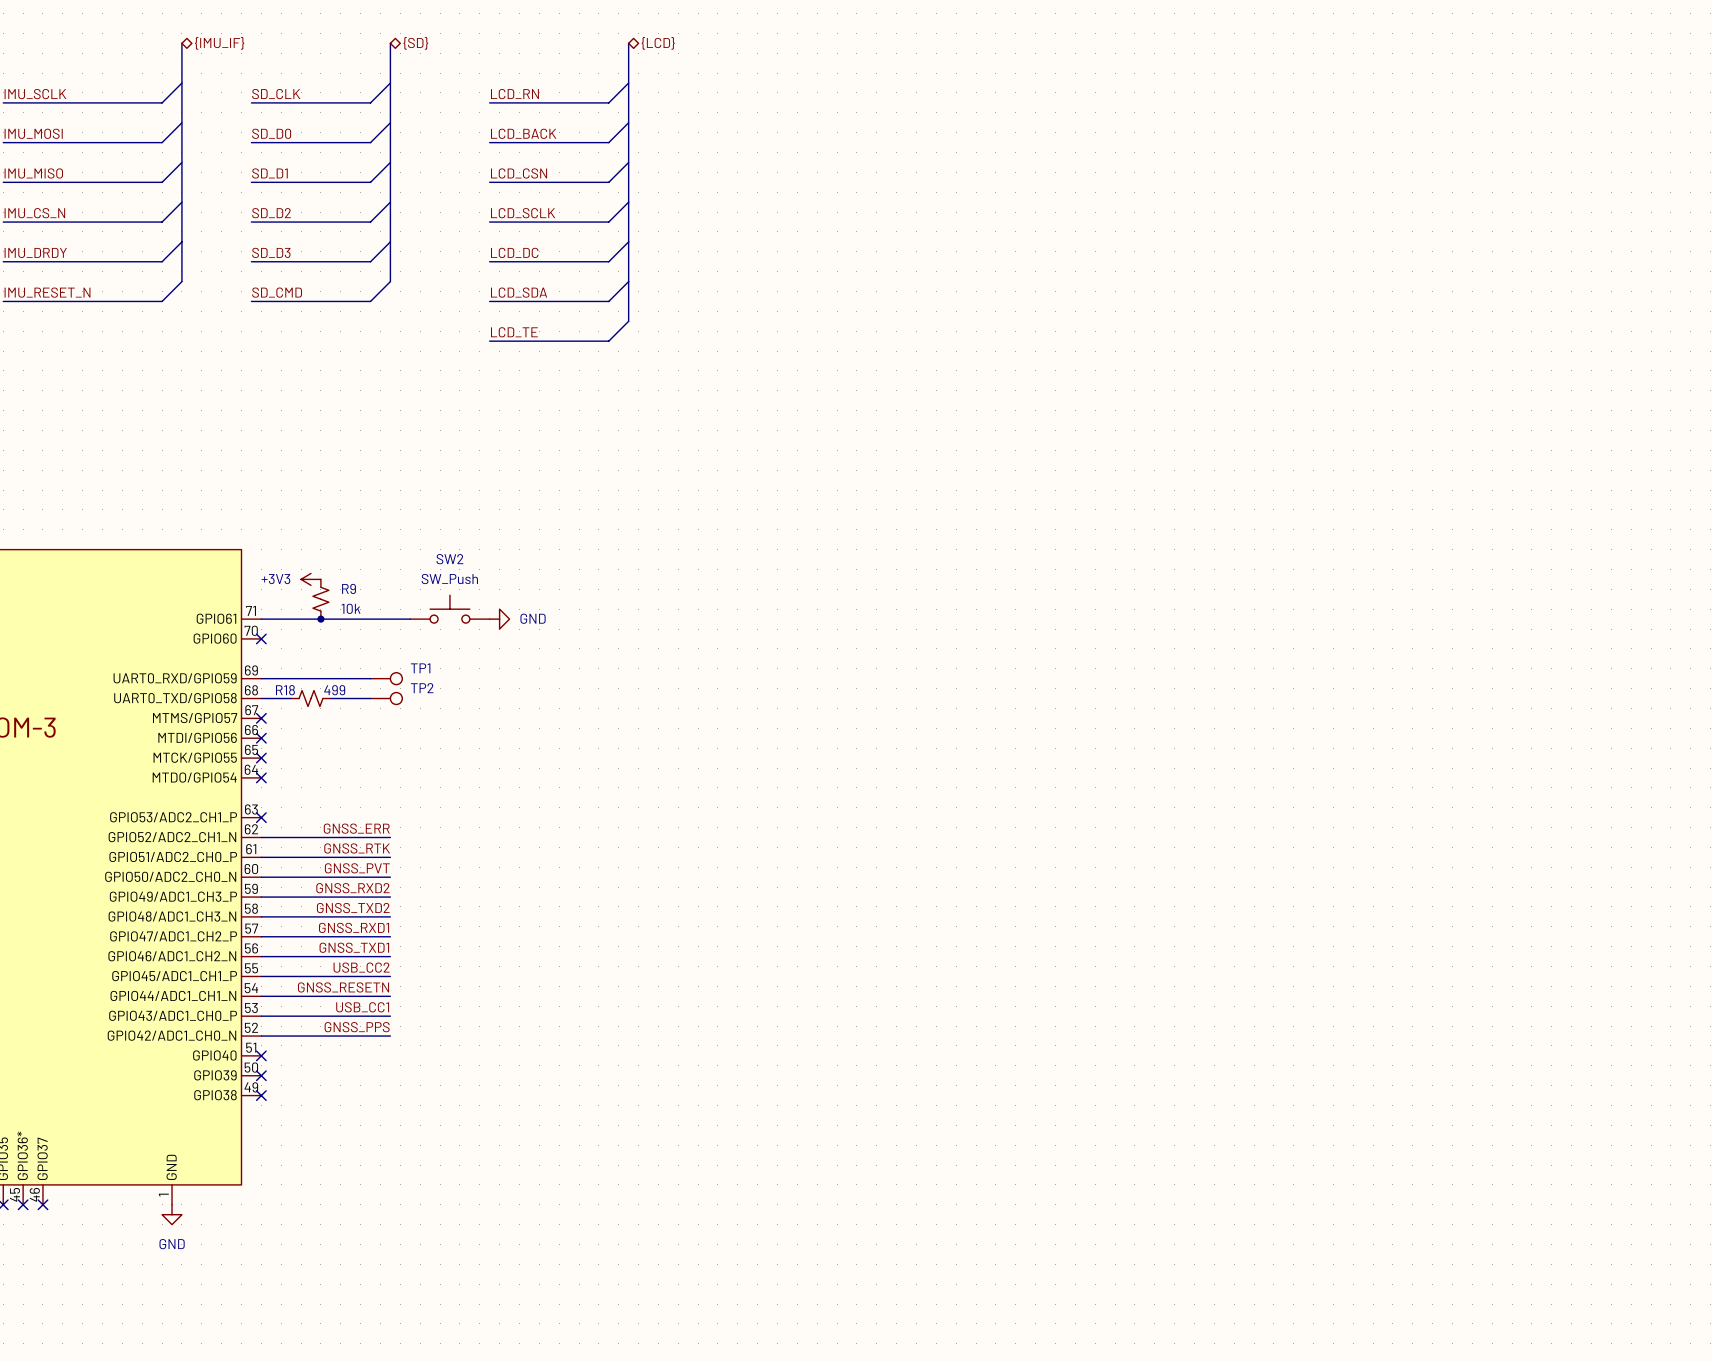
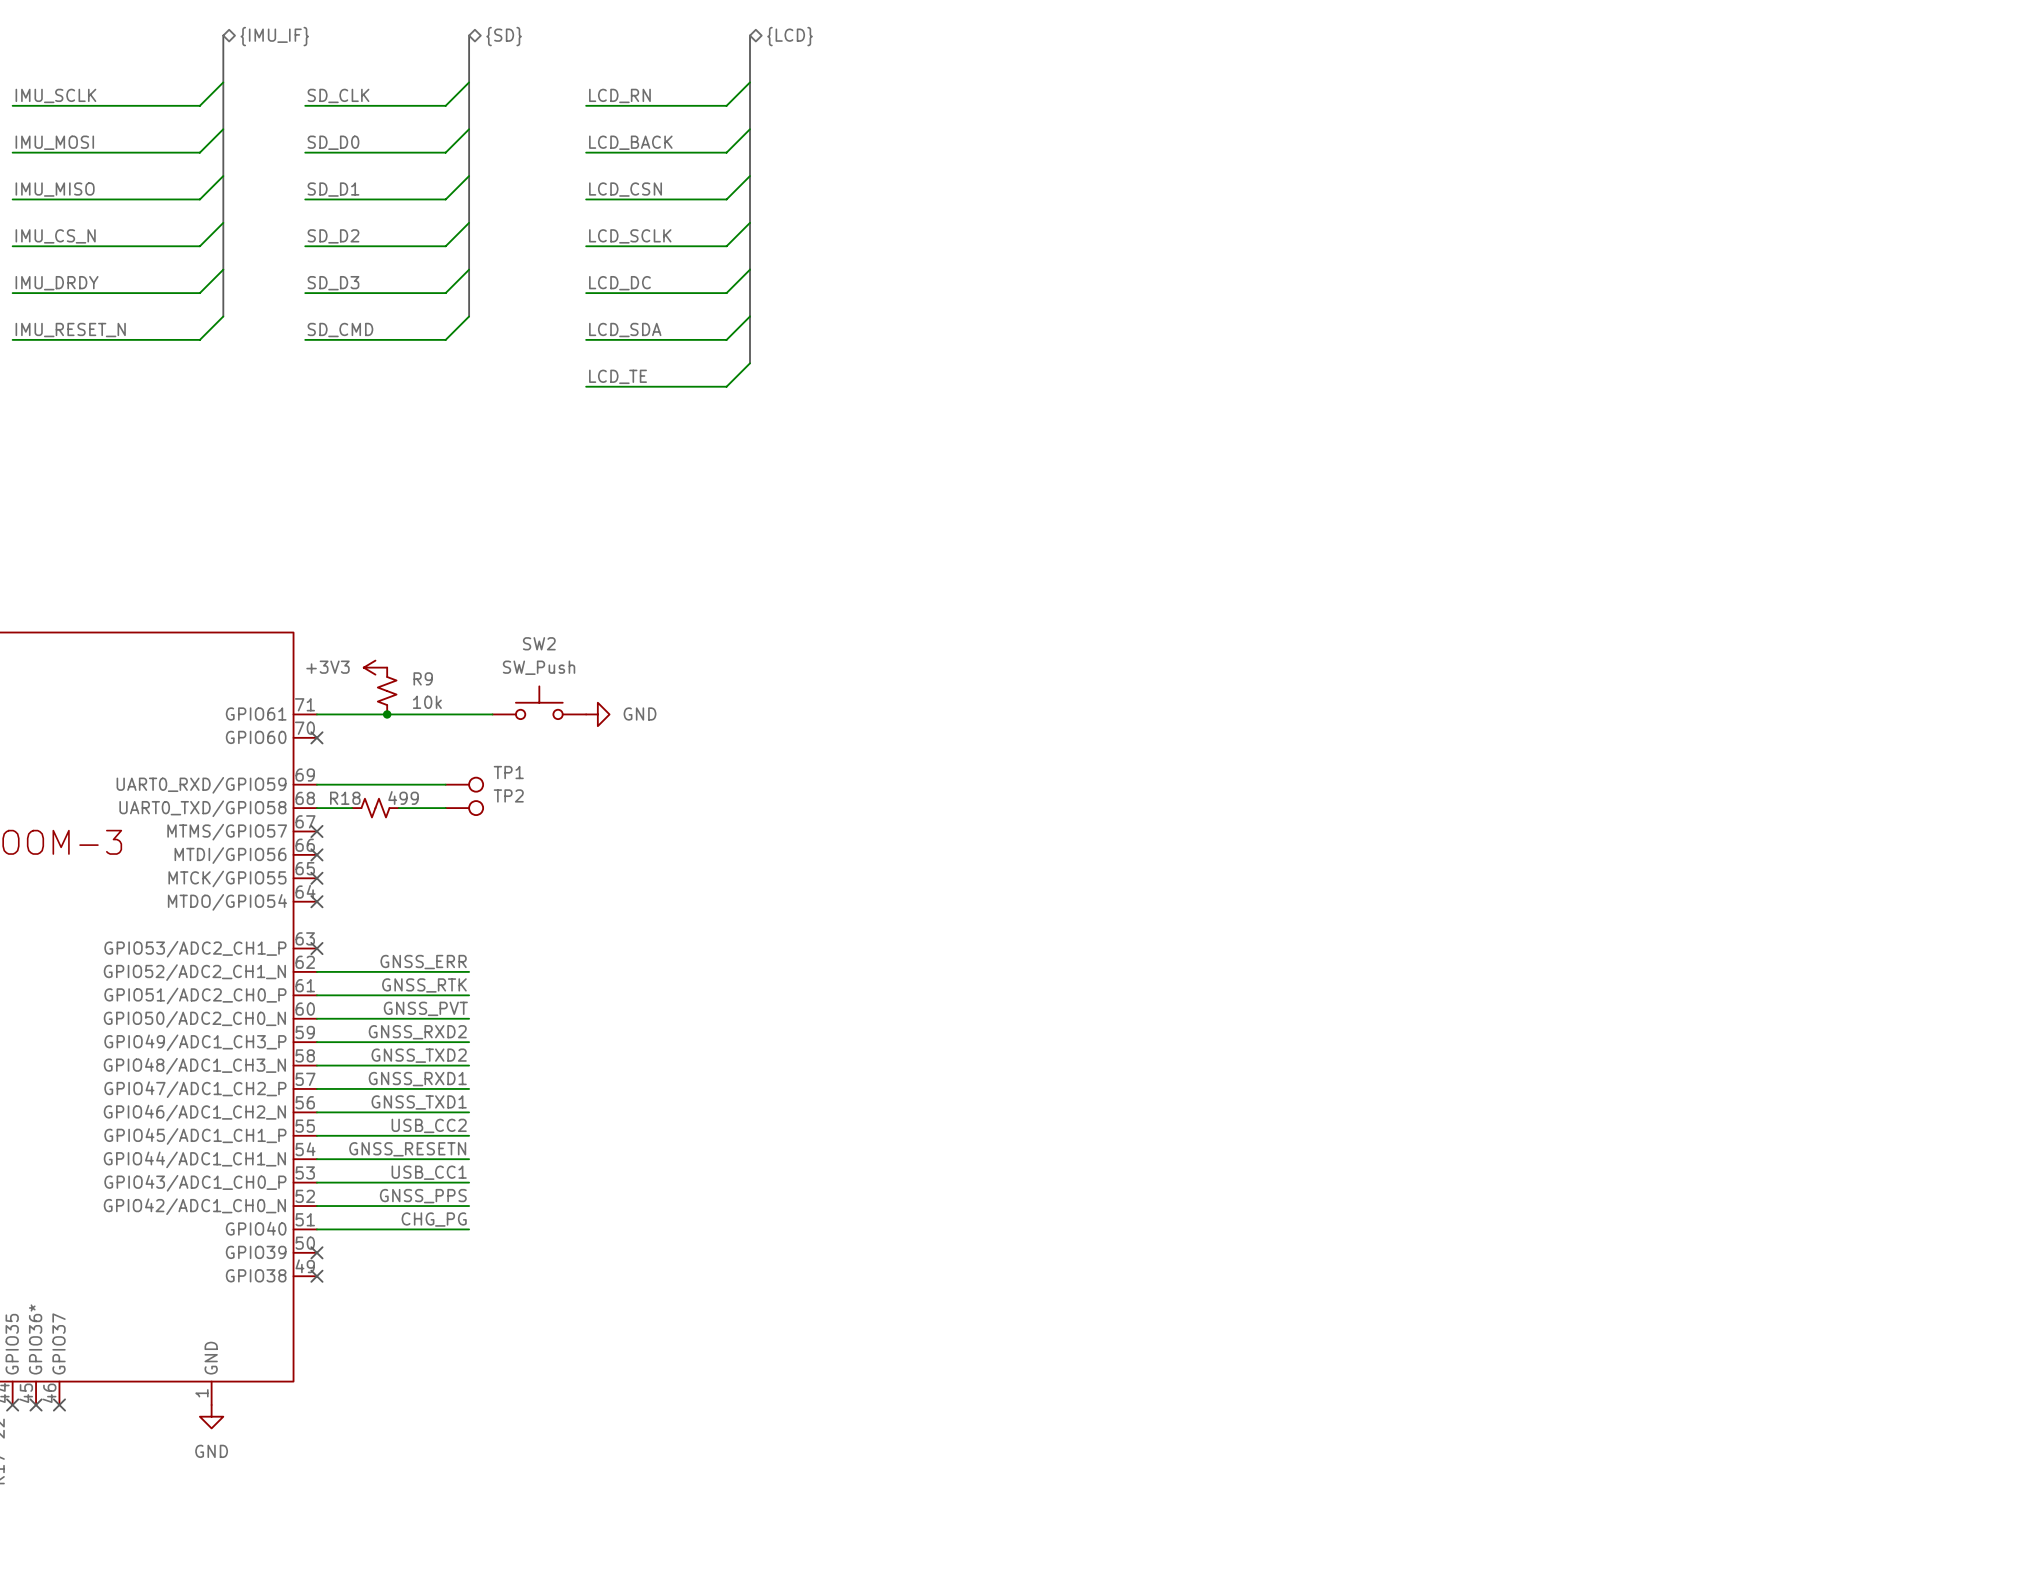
label: none -> CHG_PG (434, 1219)
wire: none -> (316, 1229) (469, 1229)
no-connect mark: (261, 1055) -> none

